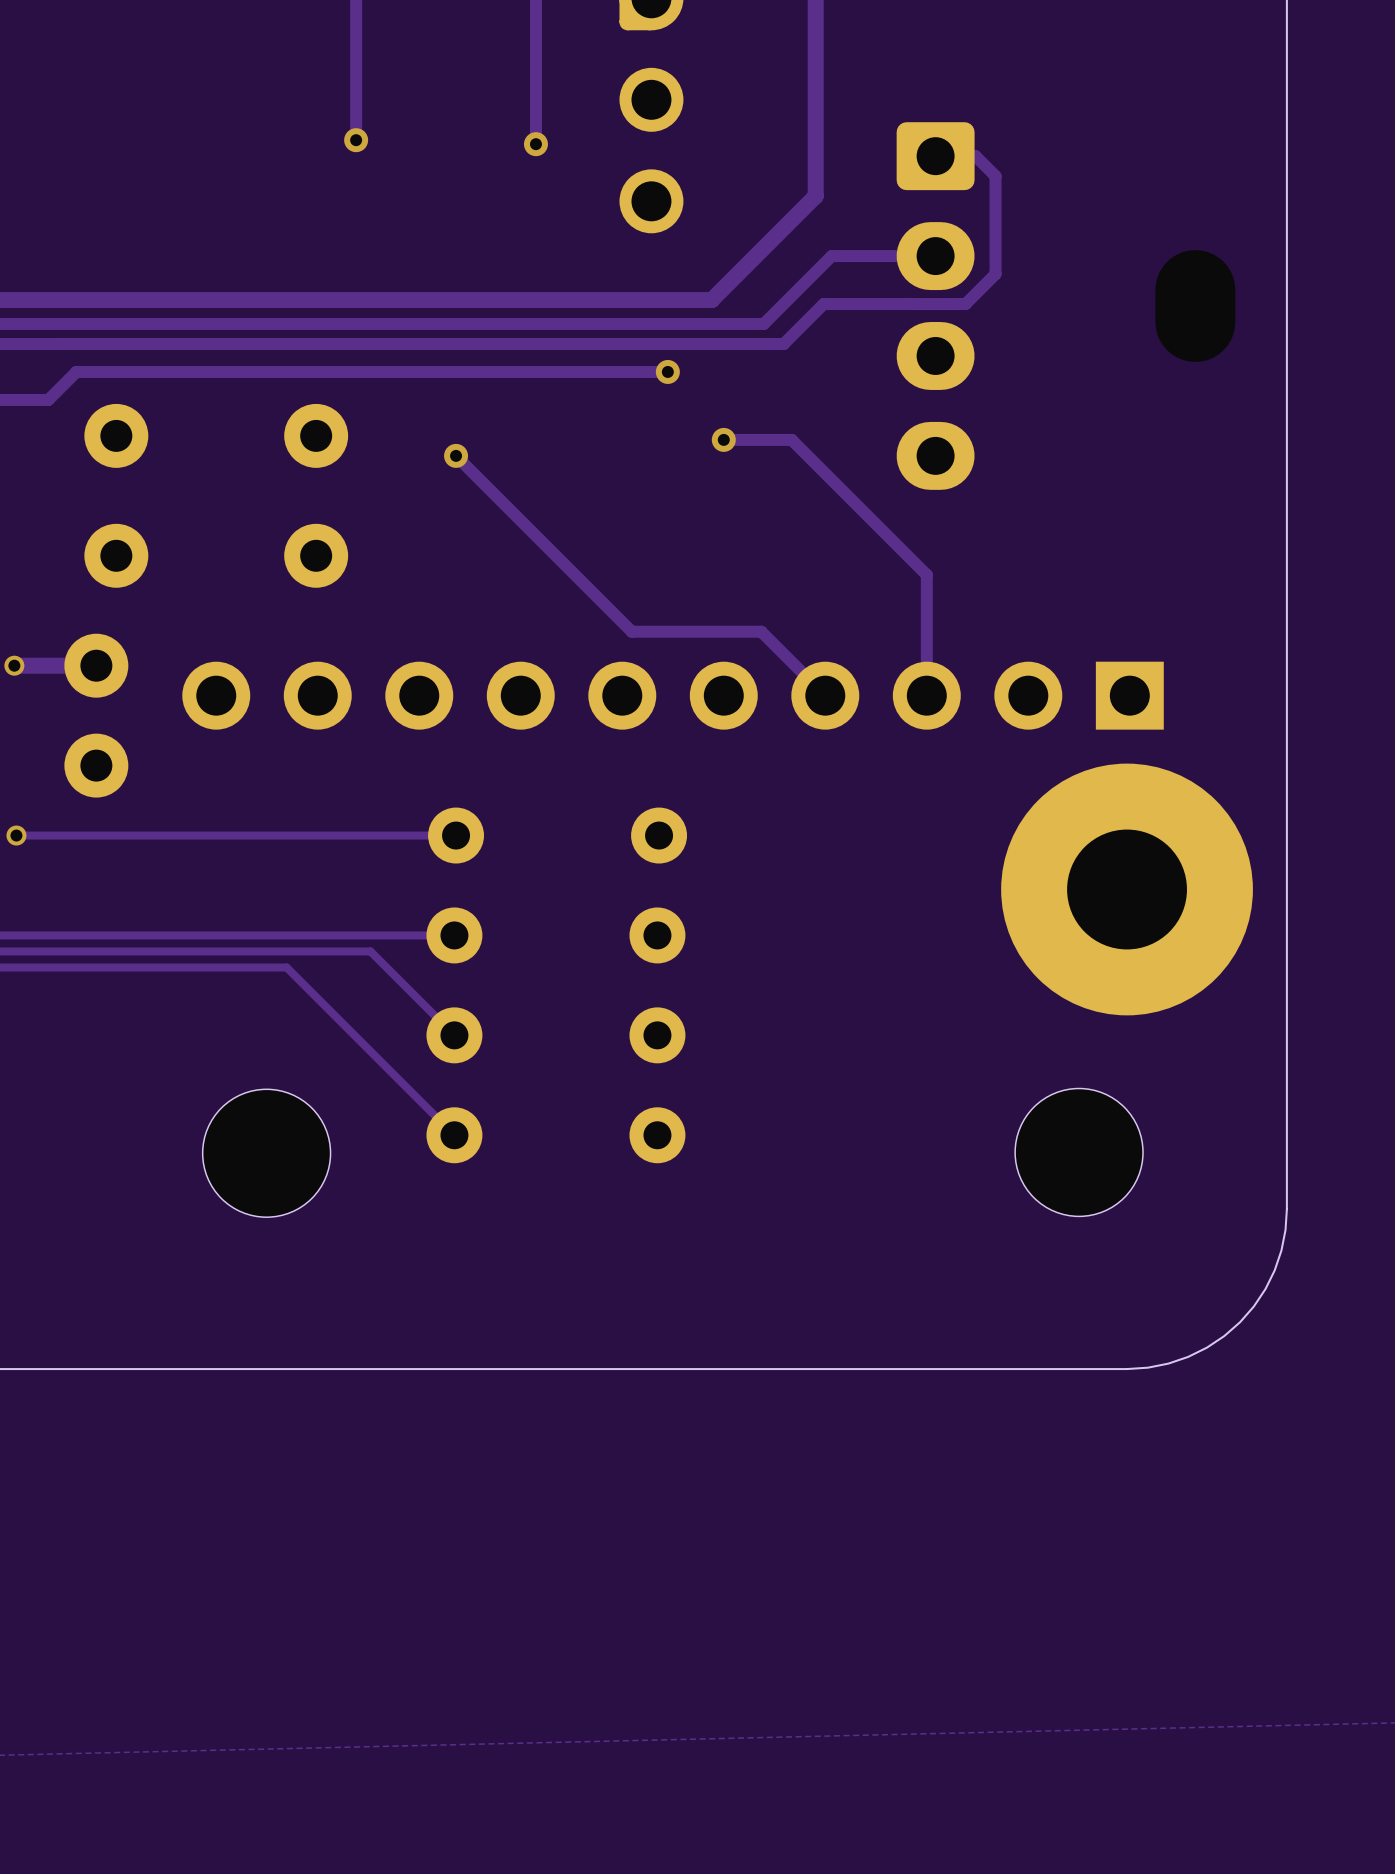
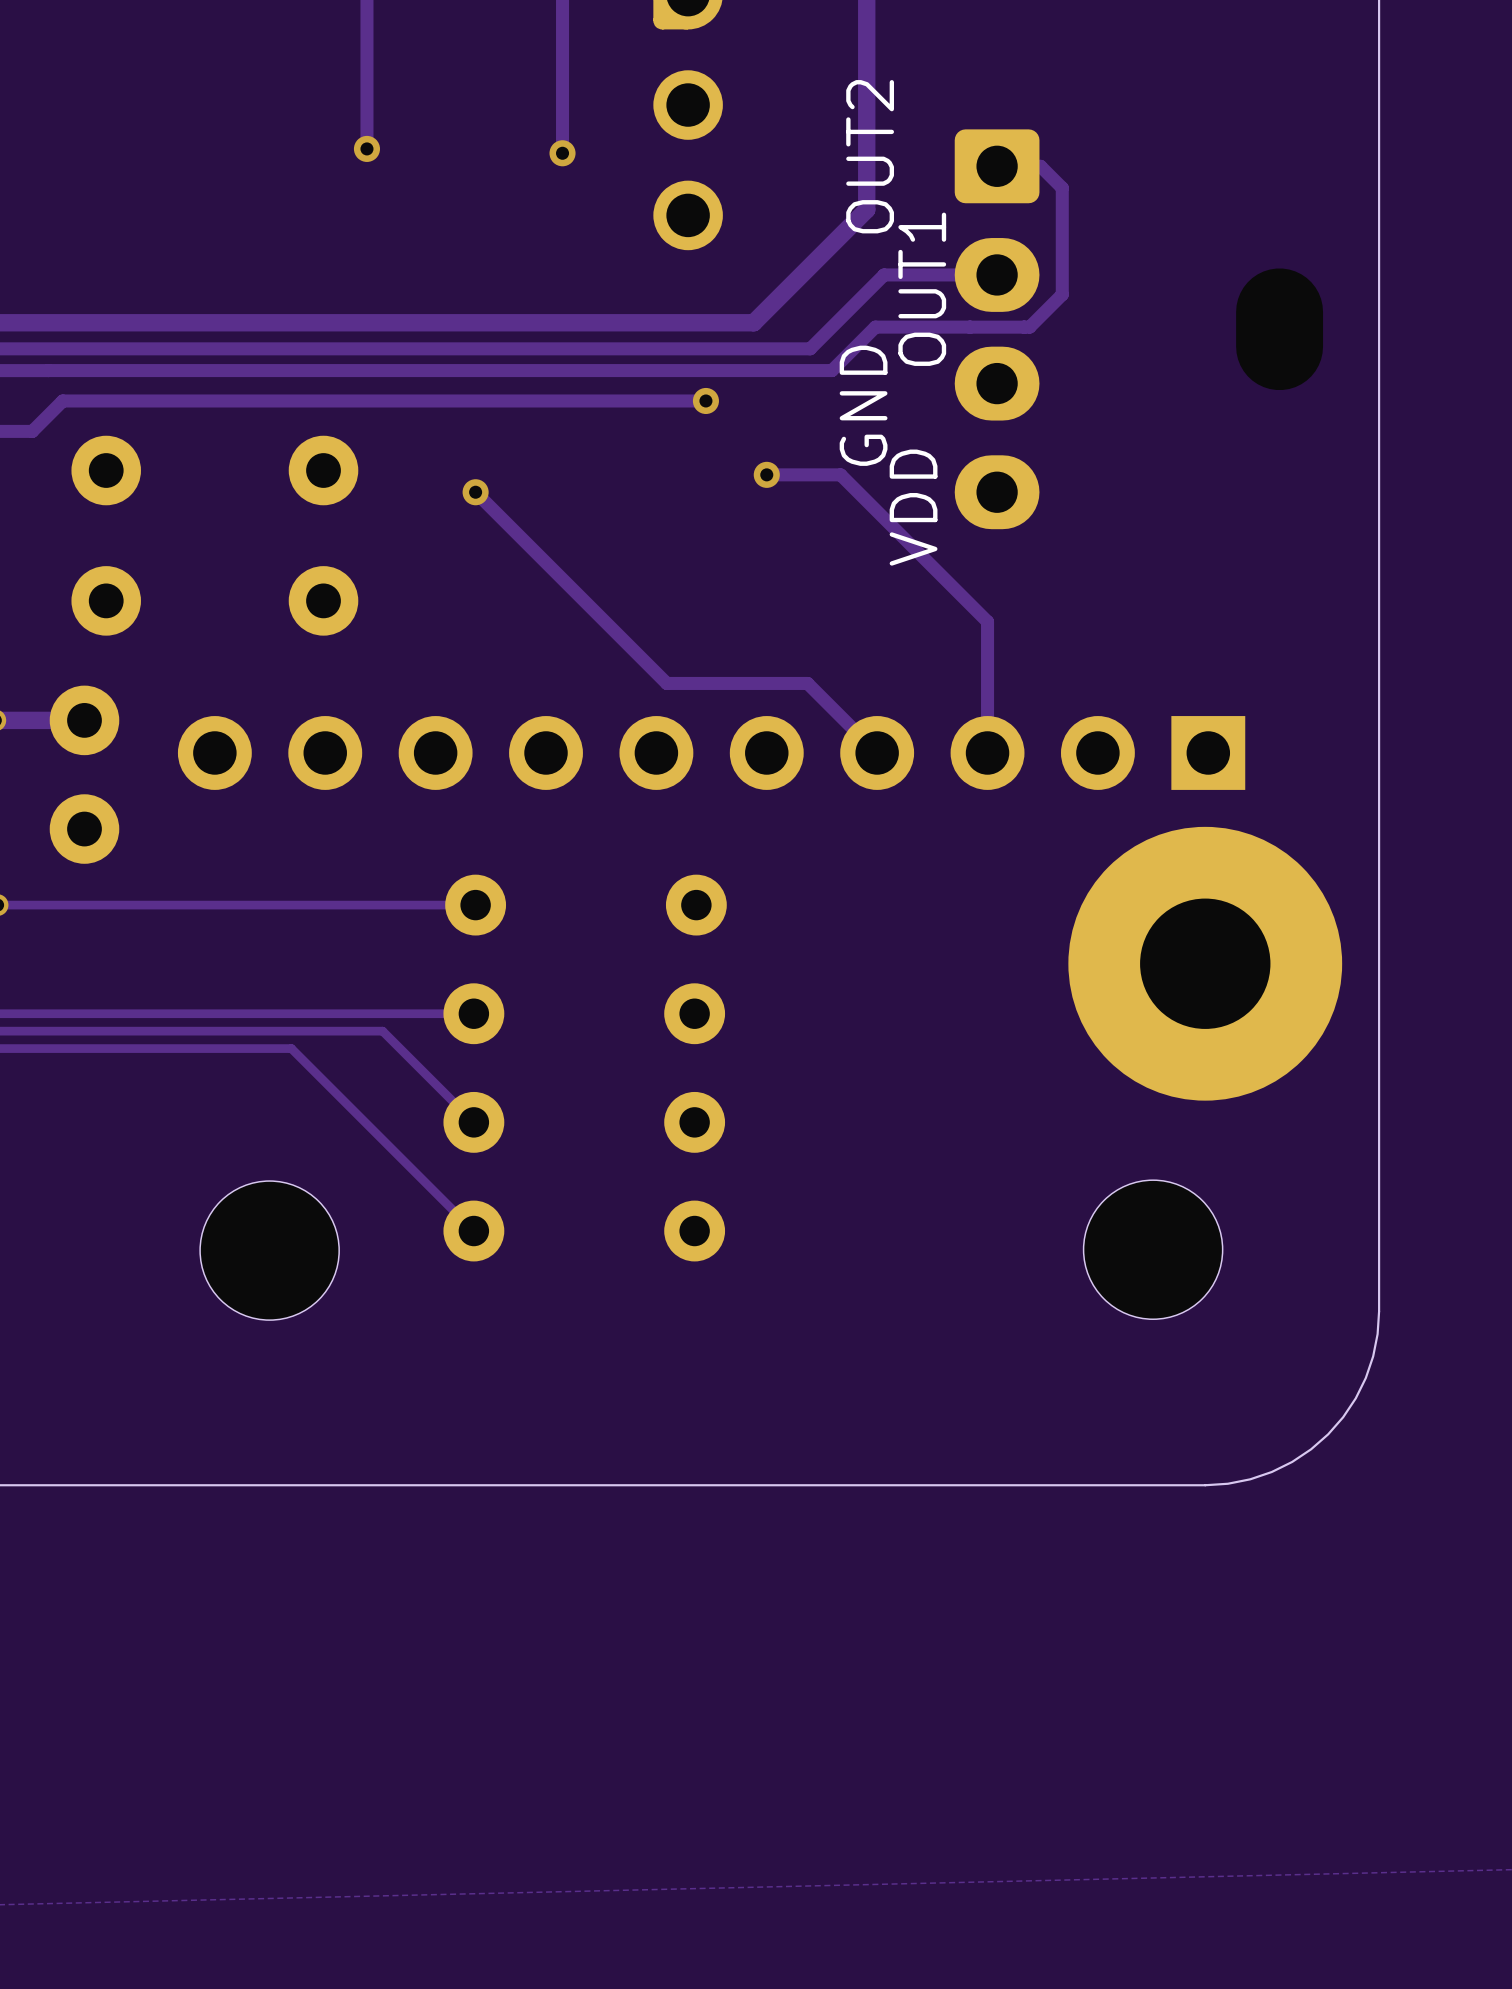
text: none -> OUT2 (870, 156)
text: none -> OUT1 (922, 289)
text: none -> GND (863, 405)
text: none -> VDD (913, 507)

